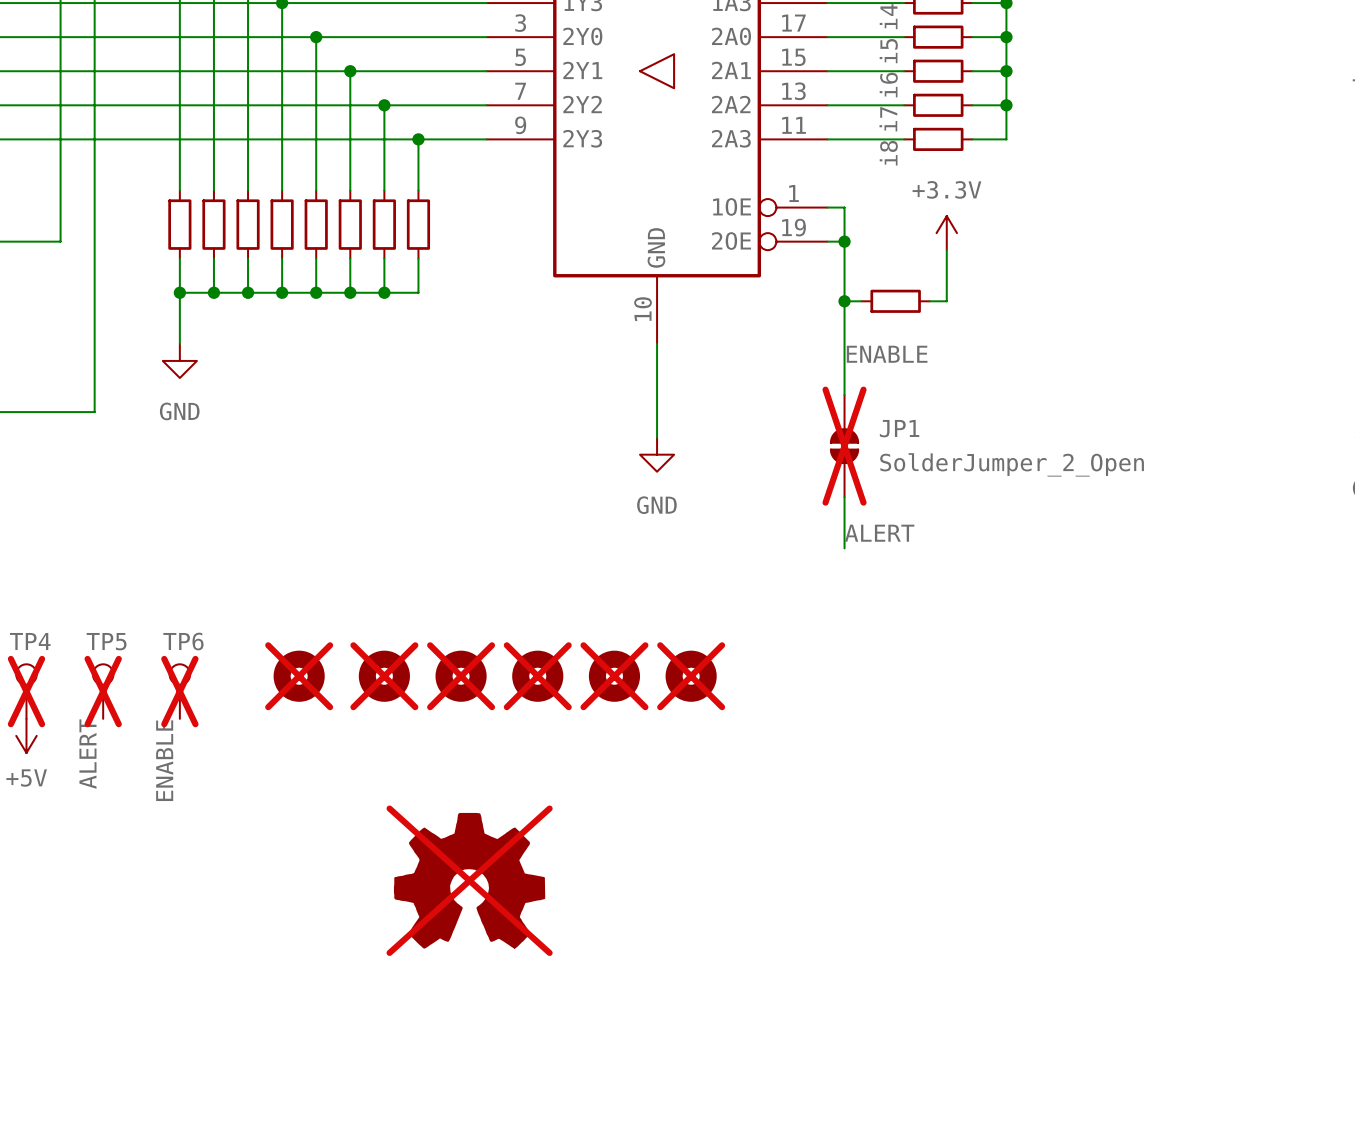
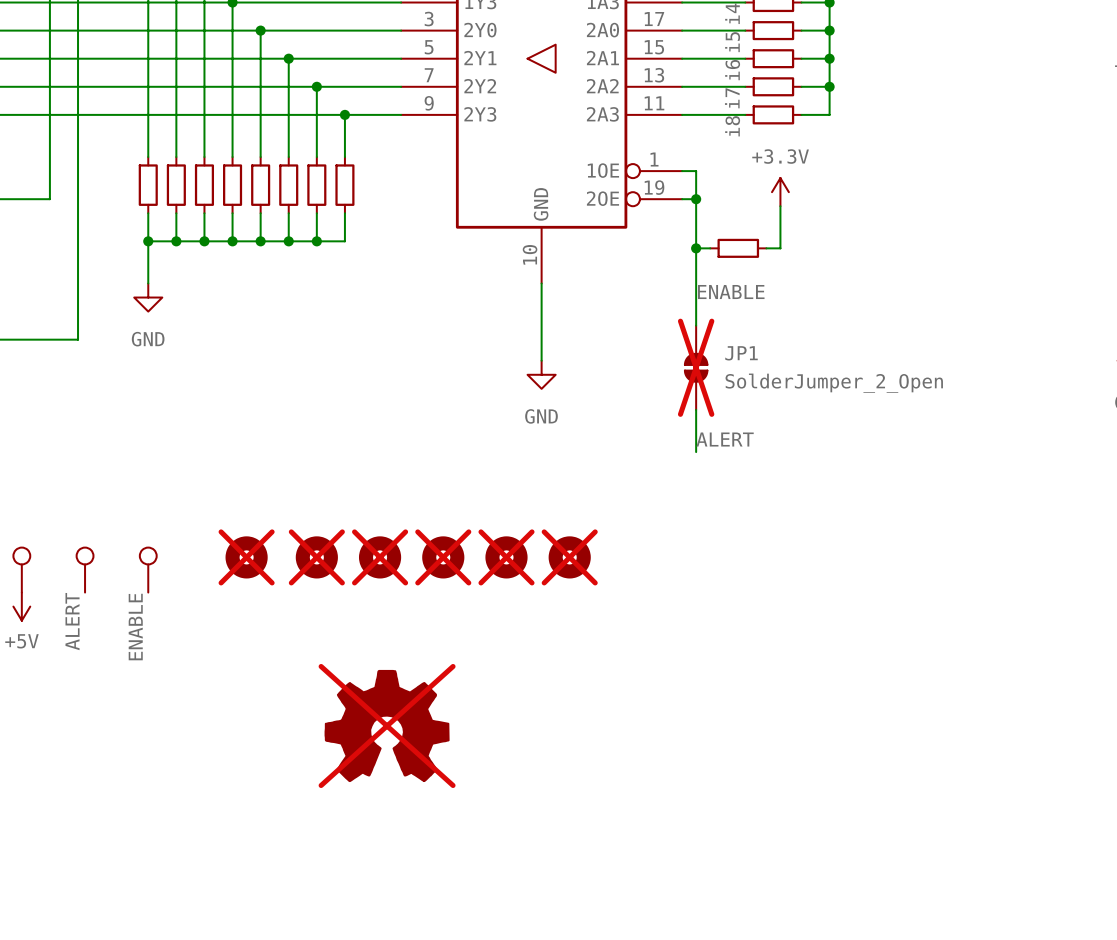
TP4 name: TP4 (30, 641) -> none
TP5 name: TP5 (106, 641) -> none
TP6 name: TP6 (183, 641) -> none
TP4 do-not-place cross: (26, 691) -> none
TP5 do-not-place cross: (103, 691) -> none
TP6 do-not-place cross: (179, 691) -> none

